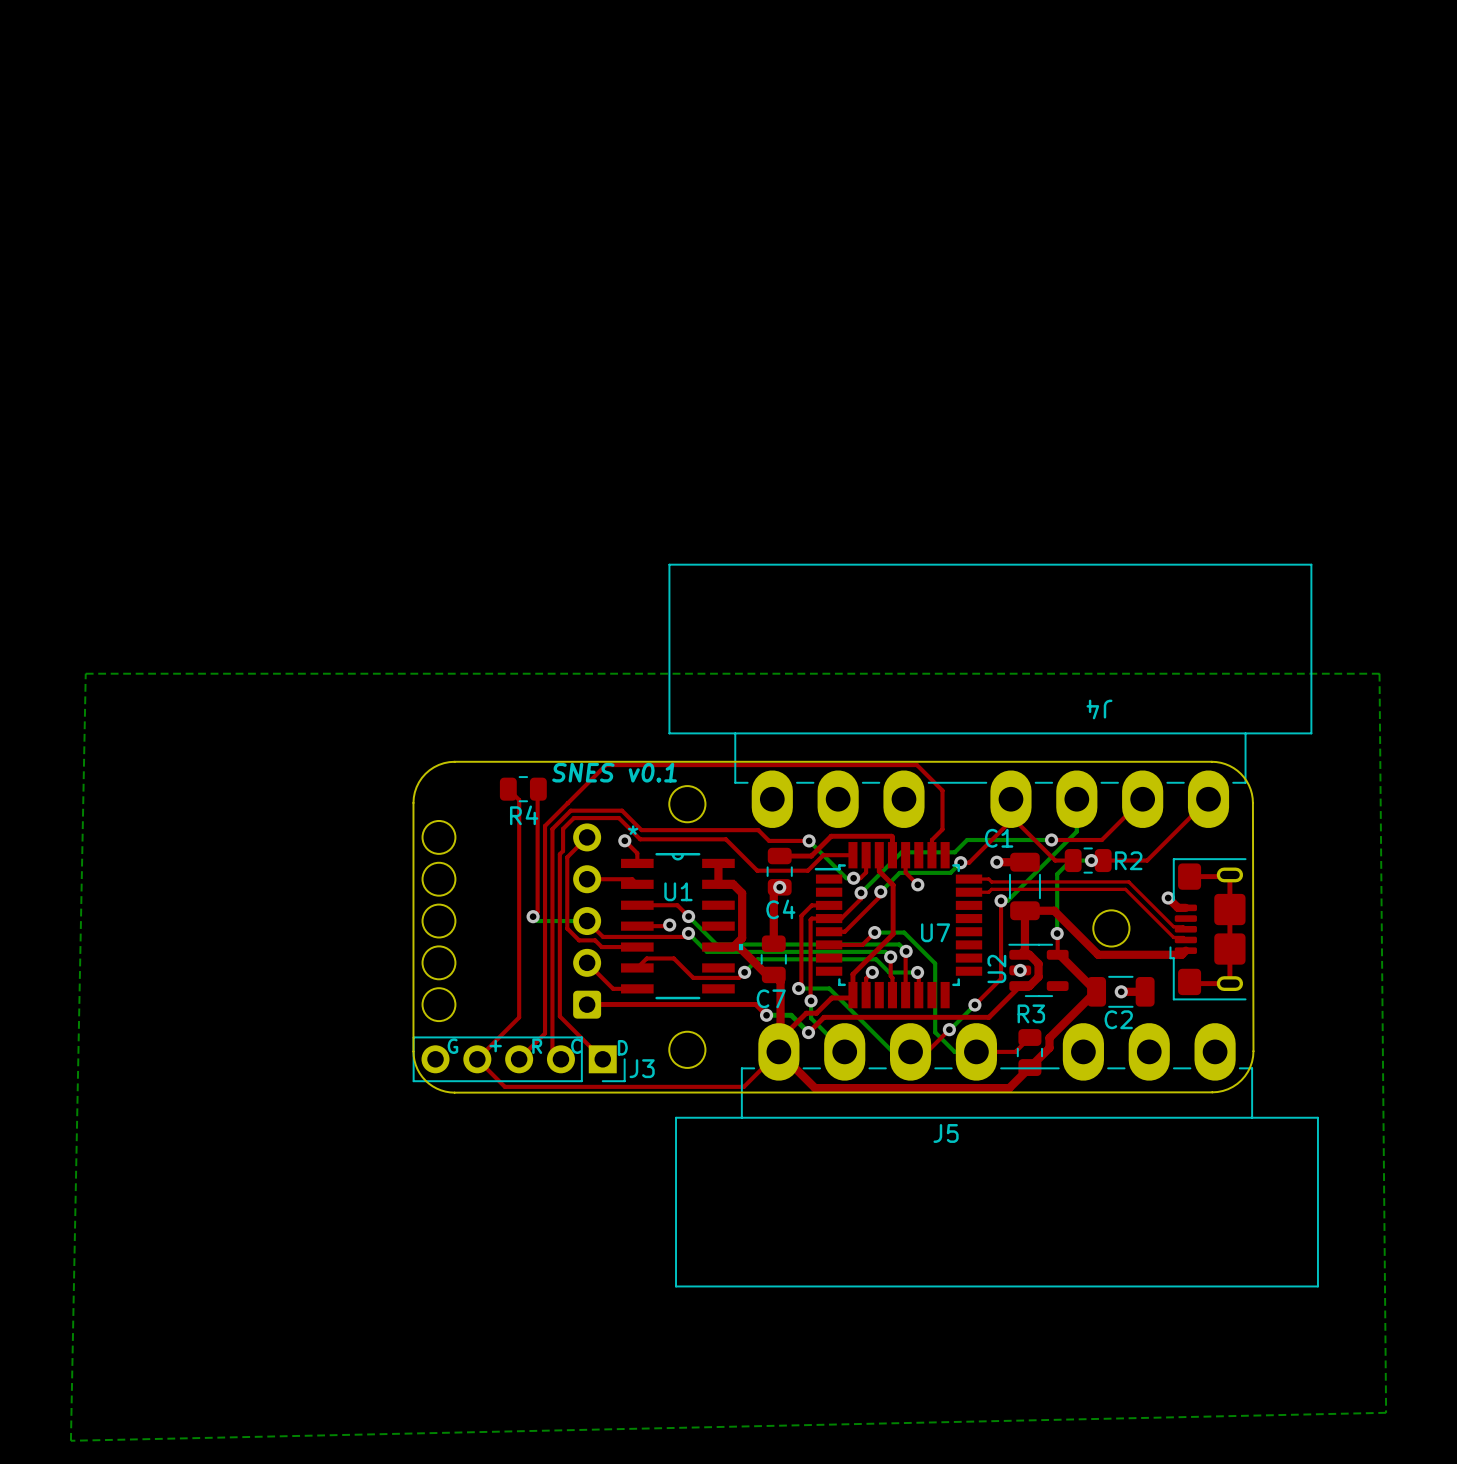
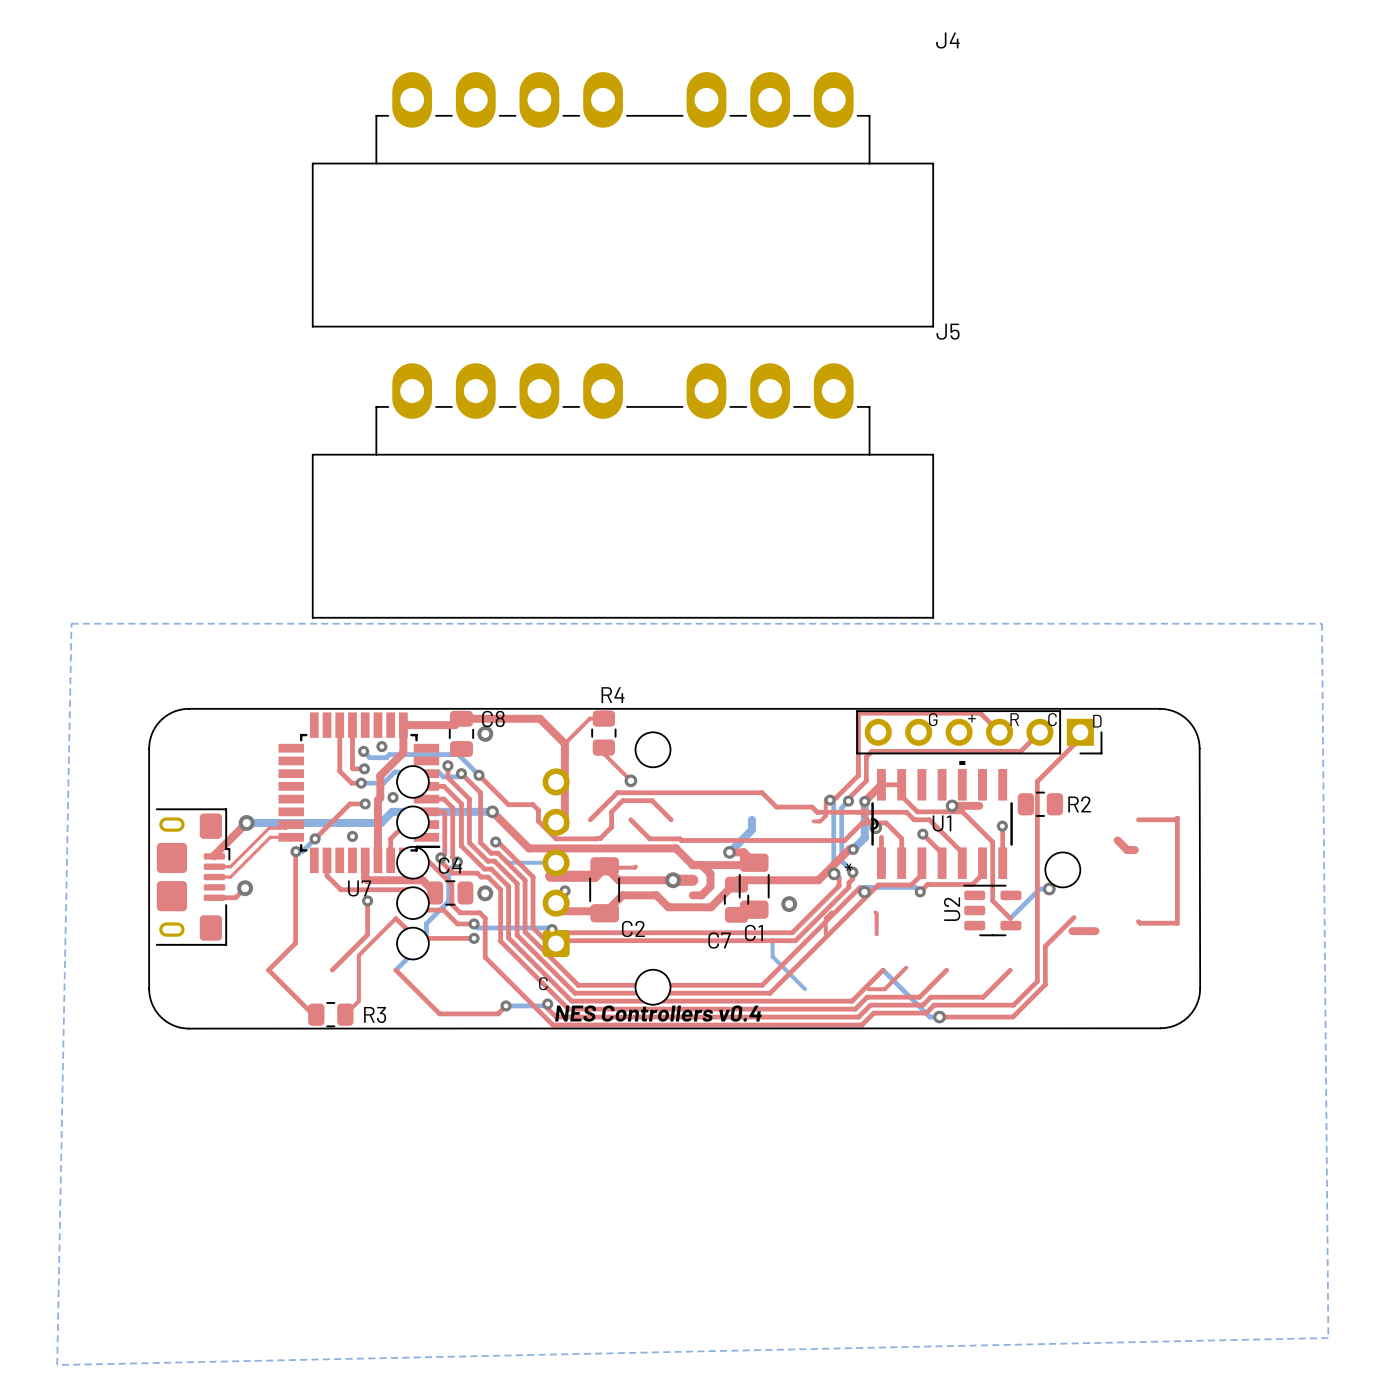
J4 rotation: 0° (990, 695) -> 180° (622, 199)
J4 position: (990, 695) -> (622, 199)
J4 name position: J4 (1099, 709) -> J4 (947, 40)
board edge: (454, 761) (438, 764) (425, 773) (416, 787) (413, 802) (413, 1056) (419, 1073) (425, 1080) (436, 1088) (454, 1092) (1212, 1092) -> (428, 708) (188, 708) (171, 712) (157, 723) (151, 735) (149, 748) (149, 988) (153, 1006) (164, 1019) (175, 1026) (188, 1028) (1160, 1028)
top track: none -> (603, 718) (589, 718) (564, 743)
text: SNES v0.1 (614, 772) -> none
text: none -> G (933, 719)
text: none -> + (971, 718)
text: none -> R (1014, 719)
text: none -> C (1052, 719)
text: none -> D (1097, 721)
top track: none -> (339, 725) (339, 771) (351, 783) (361, 783)
top track: none -> (352, 725) (352, 768) (364, 768)
part: none -> (979, 732)
top track: none -> (999, 732) (980, 713) (859, 713) (858, 775) (835, 798) (830, 800)
top track: none -> (1039, 732) (1020, 751) (871, 751) (866, 756) (866, 780) (848, 798) (848, 801)
top track: none -> (1080, 732) (1080, 738) (1037, 781) (1037, 981) (1013, 1005) (934, 1005) (926, 1013) (873, 1013) (861, 1025) (552, 1025) (485, 957) (485, 918) (479, 912) (460, 912) (451, 904) (451, 884) (427, 860) (403, 860)
C8: none -> (461, 733)
via: none -> (485, 733)
top track: (508, 789) (519, 800) (519, 1017) (477, 1059) (504, 1086) (743, 1086) (778, 1051) -> none
R4 rotation: 0° (523, 789) -> 90° clockwise (603, 733)
R4 position: (523, 789) -> (603, 733)
top track: (538, 789) (537, 912) (533, 916) -> none
top track: none -> (564, 743) (539, 718) (461, 718) (455, 725) (403, 725) (403, 752) (380, 775) (380, 797) (377, 800) (377, 860)
top track: none -> (564, 743) (564, 827)
top track: (1010, 799) (1010, 820) (969, 862) (960, 862) -> none
bottom track: (1076, 799) (1076, 831) (1007, 900) (1001, 900) -> none
top track: (1142, 799) (1101, 840) (1051, 840) -> none
top track: (1208, 799) (1147, 860) (1091, 860) -> none
via: none -> (381, 746)
top track: none -> (603, 747) (603, 753) (630, 780)
bottom track: none -> (363, 751) (369, 757) (386, 757) (389, 754) (458, 754) (478, 775)
via: none -> (363, 751)
R4 name position: R4 (524, 815) -> R4 (612, 695)
top track: (1010, 816) (1055, 860) (1073, 860) -> none
top track: none -> (447, 765) (447, 777) (469, 799) (469, 842) (487, 861) (494, 861) (517, 883) (517, 935) (575, 993) (770, 993) (878, 885) (911, 885) (921, 874) (921, 863)
via: none -> (447, 765)
via: none -> (364, 768)
top track: none -> (461, 773) (480, 792) (480, 842) (491, 853) (497, 853) (525, 880) (525, 932) (578, 985) (762, 985) (860, 887)
bottom track: none -> (461, 773) (458, 776) (443, 776) (438, 772) (394, 772) (383, 783) (361, 783)
via: none -> (461, 773)
top track: none -> (478, 775) (508, 804) (532, 804) (538, 810) (538, 821) (556, 838) (600, 838) (611, 827) (611, 811) (622, 800) (652, 800) (671, 819)
via: none -> (478, 775)
top track: (587, 837) (567, 857) (567, 928) (579, 940) (595, 940) (601, 947) (637, 947) -> none
via: none -> (361, 783)
C1 name position: C1 (999, 838) -> C1 (753, 932)
top track: (624, 840) (637, 853) (637, 863) -> none
via position: (624, 840) -> (630, 780)
top track: (809, 840) (769, 840) (758, 830) (641, 830) (622, 810) (570, 810) (552, 829) (552, 1050) (560, 1059) -> none
bottom track: (809, 840) (846, 878) (853, 878) -> none
via: (809, 840) -> none
bottom track: (1051, 840) (967, 840) (954, 852) (901, 852) (861, 892) -> none
via: (1051, 840) -> none
top track: none -> (426, 786) (443, 786) (461, 803) (461, 846) (484, 869) (491, 869) (508, 886) (508, 937) (571, 1001) (852, 1001) (883, 970)
via: none -> (393, 797)
top track: none -> (426, 799) (443, 799) (452, 807) (452, 857) (457, 862)
top track: (852, 855) (823, 855) (807, 870) (757, 870) (725, 839) (640, 839) (618, 818) (573, 818) (563, 828) (563, 850) (559, 854) (559, 1016) (602, 1059) -> none
top track: (879, 855) (879, 871) (893, 885) (893, 934) (852, 974) (852, 995) (850, 997) (831, 997) (816, 1013) (806, 1013) (778, 1040) (778, 1051) -> none
top track: (892, 855) (891, 836) (831, 836) (811, 856) (779, 856) -> none
top track: (931, 855) (931, 839) (942, 829) (942, 790) (916, 765) (605, 765) (545, 825) (545, 1033) (519, 1059) -> none
bottom track: none -> (830, 800) (833, 803) (833, 872) (839, 877)
via: none -> (830, 800)
bottom track: none -> (848, 801) (841, 807) (841, 861) (852, 872)
via: none -> (848, 801)
top track: none -> (864, 801) (881, 784) (901, 784) (901, 796) (917, 811) (962, 811) (992, 842) (992, 900) (1010, 918)
bottom track: none -> (864, 801) (864, 837) (853, 849)
via: none -> (864, 801)
top track: none -> (365, 803) (350, 803) (315, 838)
via: none -> (365, 803)
bottom track: (1091, 860) (1070, 860) (1057, 874) (1057, 933) -> none
via: (1091, 860) -> none
bottom track: (960, 862) (950, 872) (899, 872) (880, 891) -> none
via: (960, 862) -> none
top track: (718, 863) (718, 884) (733, 884) (742, 893) (742, 938) (733, 947) -> none
top track: none -> (426, 811) (444, 812) (444, 854) (440, 857) (440, 861) (452, 873) (477, 873) (481, 877) (488, 877) (500, 889) (500, 941) (568, 1009) (855, 1009) (867, 997) (919, 997) (946, 970)
top track: none -> (492, 811) (529, 848) (676, 848) (692, 865) (751, 865) (754, 862) (743, 852) (729, 852)
bottom track: none -> (492, 811) (392, 811) (381, 822) (246, 822)
C4 rotation: 0° (779, 871) -> 90° clockwise (450, 892)
C4 position: (779, 871) -> (450, 892)
top track: none -> (590, 819) (617, 792) (762, 792) (776, 807) (812, 807) (817, 812) (906, 812) (914, 819) (929, 819) (962, 852) (962, 863)
top track: none -> (630, 819) (649, 838) (679, 838) (681, 840) (844, 840) (862, 822) (886, 822) (901, 838) (901, 874)
bottom track: none -> (751, 819) (751, 829) (729, 852)
via: (853, 878) -> none
top track: none -> (246, 822) (214, 856)
via: none -> (246, 822)
top track: (587, 879) (632, 879) (637, 884) -> none
top track: (969, 879) (988, 879) (991, 881) (1128, 881) (1173, 926) (1183, 926) (1185, 929) -> none
top track: none -> (289, 824) (286, 828) (269, 828) (230, 866) (214, 866)
top track: none -> (405, 824) (390, 838) (390, 860)
top track: none -> (1002, 826) (1002, 863)
via: none -> (1002, 826)
C1 position: (1024, 886) -> (754, 886)
top track: (779, 887) (773, 893) (773, 943) -> none
via position: (779, 887) -> (729, 852)
U1 name position: U1 (678, 891) -> U1 (942, 823)
top track: (880, 891) (880, 895) (844, 931) (829, 931) -> none
via: (880, 891) -> none
top track: none -> (922, 834) (942, 853) (942, 863)
via: none -> (922, 834)
top track: (861, 892) (861, 898) (841, 918) (810, 919) (811, 1000) -> none
via: (861, 892) -> none
top track: (969, 892) (988, 892) (991, 889) (1125, 889) (1173, 937) (1183, 937) (1185, 939) -> none
via: none -> (352, 836)
top track: none -> (289, 837) (270, 837) (230, 877) (214, 877)
top track: none -> (881, 837) (881, 863)
bottom track: none -> (315, 838) (302, 851) (296, 851)
via: none -> (315, 838)
via: (1168, 897) -> none
top track: none -> (495, 842) (498, 842) (533, 877) (533, 927) (545, 940) (795, 940) (848, 887) (848, 882) (852, 878) (852, 872)
via: none -> (495, 842)
top track: (1001, 900) (1001, 978) (974, 1004) -> none
via: (1001, 900) -> none
top track: (637, 905) (677, 905) (688, 916) -> none
top track: (829, 905) (811, 905) (801, 915) (801, 985) (798, 988) -> none
top track: none -> (853, 849) (849, 849) (818, 880) (738, 880) (711, 907) (668, 907) (656, 895) (622, 895) (604, 913) (602, 911) (555, 911) (550, 906) (565, 890)
via: none -> (853, 849)
top track: none -> (296, 851) (295, 943) (268, 970) (313, 1014) (316, 1014)
via: none -> (296, 851)
C4 name position: C4 (780, 909) -> C4 (450, 865)
via: none -> (440, 857)
via position: (533, 916) -> (492, 811)
bottom track: (688, 916) (716, 944) (899, 944) (906, 951) -> none
via: (688, 916) -> none
top track: none -> (327, 860) (327, 875) (340, 889) (407, 889) (427, 910) (443, 910) (457, 923) (474, 923)
top track: none -> (365, 860) (365, 877) (367, 880) (422, 880) (435, 892)
bottom track: none -> (457, 862) (448, 870) (448, 901) (426, 923) (426, 939) (395, 970)
via: none -> (457, 862)
top track: (587, 921) (603, 936) (684, 936) (688, 933) -> none
top track: none -> (982, 863) (982, 874) (972, 884) (927, 884) (920, 891)
top track: none -> (701, 865) (710, 873) (710, 886) (701, 895) (692, 895)
via: (669, 925) -> none
U7 rotation: 0° (898, 925) -> 180° (359, 792)
U7 position: (898, 925) -> (359, 792)
U1 rotation: 0° (682, 926) -> 90° counterclockwise (942, 819)
U1 position: (682, 926) -> (942, 819)
part: (1208, 929) -> none
via: none -> (852, 872)
top track: (874, 932) (862, 944) (829, 944) -> none
bottom track: (874, 932) (904, 932) (935, 963) (935, 1032) (954, 1051) (976, 1051) -> none
U7 name position: U7 (935, 932) -> U7 (359, 888)
bottom track: (688, 933) (707, 951) (885, 951) (890, 956) -> none
via: (688, 933) -> none
top track: (1057, 933) (1057, 954) (1096, 991) (1049, 1038) (1049, 1047) (1009, 1088) (815, 1088) (778, 1051) -> none
via: (1057, 933) -> none
part: none -> (193, 877)
top track: none -> (550, 876) (594, 876) (604, 866) (618, 880) (692, 880)
top track: none -> (839, 877) (839, 885) (792, 932) (555, 932) (552, 929)
via: none -> (673, 880)
bottom track: none -> (860, 887) (915, 887) (920, 891)
top track: none -> (245, 888) (235, 897) (214, 897)
via: none -> (245, 888)
top track: (718, 947) (739, 947) (766, 974) (773, 974) (780, 981) (780, 1050) (778, 1051) -> none
bottom track: none -> (1049, 889) (1039, 889) (1010, 918)
via: none -> (1049, 889)
via: none -> (565, 890)
top track: (1185, 950) (1181, 954) (1098, 954) (1054, 910) (1024, 910) (1024, 950) (1020, 954) (1029, 954) (1038, 963) (1038, 976) (1029, 986) (1020, 986) (988, 1017) (824, 1017) (808, 1032) -> none
top track: (906, 951) (905, 995) -> none
via: none -> (920, 891)
via: none -> (485, 893)
top track: (890, 956) (892, 995) -> none
via: (890, 956) -> none
top track: none -> (367, 900) (367, 934) (332, 970)
via: none -> (367, 900)
top track: (587, 962) (613, 988) (637, 988) -> none
via: none -> (789, 904)
top track: (637, 967) (646, 958) (673, 958) (693, 977) (739, 977) (744, 972) -> none
via: (1020, 970) -> none
bottom track: (744, 972) (757, 959) (876, 959) (889, 972) (917, 972) -> none
via: (744, 972) -> none
via: (872, 972) -> none
via: (917, 972) -> none
top track: none -> (1073, 917) (1045, 946) (1045, 984) (1012, 1017) (939, 1017)
bottom track: none -> (474, 923) (478, 927) (550, 927) (552, 929)
via: none -> (474, 923)
bottom track: (798, 988) (829, 988) (892, 1051) (910, 1051) -> none
via: (798, 988) -> none
via: none -> (552, 929)
C2 rotation: 0° (1120, 991) -> 90° clockwise (604, 889)
C2 position: (1120, 991) -> (604, 889)
via: (1121, 991) -> none
C7 name position: C7 (771, 998) -> C7 (719, 940)
top track: none -> (474, 938) (415, 938) (395, 918) (358, 955) (358, 1001) (345, 1014)
via: none -> (474, 938)
via: (811, 1000) -> none
top track: (587, 1004) (755, 1004) (766, 1015) -> none
bottom track: (974, 1004) (949, 1029) -> none
via: (974, 1004) -> none
bottom track: (766, 1015) (791, 1015) (808, 1032) -> none
via: (766, 1015) -> none
C2 name position: C2 (1118, 1019) -> C2 (633, 928)
via: (949, 1029) -> none
top track: none -> (395, 970) (439, 1013) (498, 1013) (506, 1005)
via: (808, 1032) -> none
bottom track: none -> (883, 970) (929, 1017) (939, 1017)
top track: none -> (1010, 970) (983, 997) (930, 997) (922, 1005) (870, 1005) (858, 1017) (556, 1017) (547, 1008) (547, 1004)
top track: (1029, 1037) (1015, 1051) (976, 1051) -> none
text: G (452, 1046) -> none
text: + (495, 1046) -> none
text: R (537, 1046) -> none
text: D (622, 1047) -> none
R3 rotation: 0° (1029, 1052) -> 90° clockwise (330, 1014)
R3 position: (1029, 1052) -> (330, 1014)
J3: (519, 1059) -> none
bottom track: none -> (547, 1004) (545, 1005) (506, 1005)
via: none -> (547, 1004)
via: none -> (506, 1005)
text: none -> NES Controllers v0.4 (658, 1013)
via: none -> (939, 1017)
J5 name position: J5 (946, 1133) -> J5 (948, 331)
J5 position: (996, 1155) -> (622, 490)

